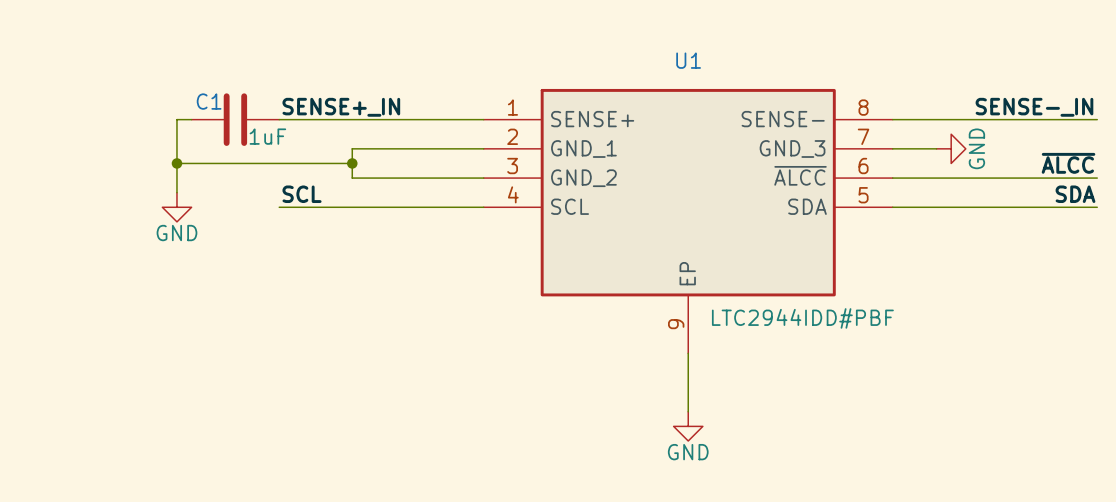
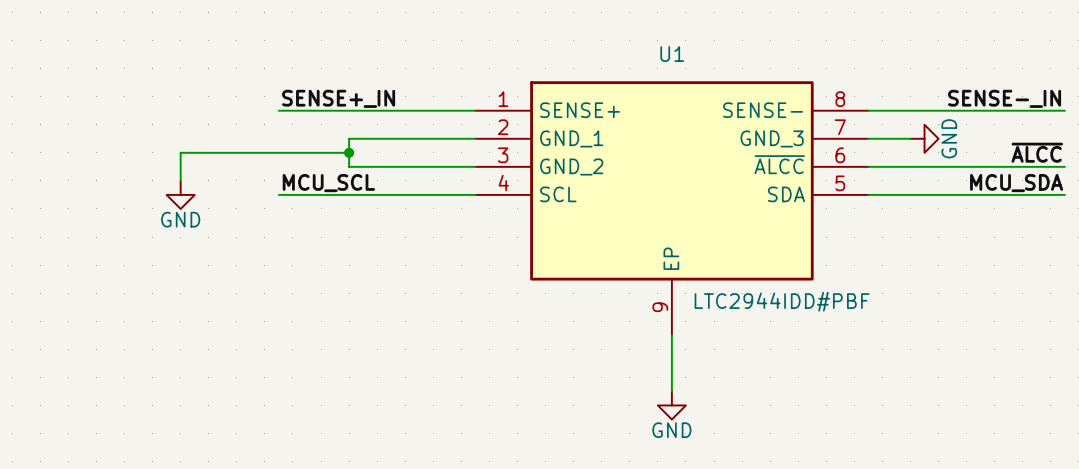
wire: (191, 119) (176, 119) (176, 163) -> none
C1: 1uF (235, 119) -> none
junction: (176, 163) -> none
label: SCL (302, 194) -> MCU_SCL (328, 183)
label: SDA (1075, 194) -> MCU_SDA (1016, 183)

